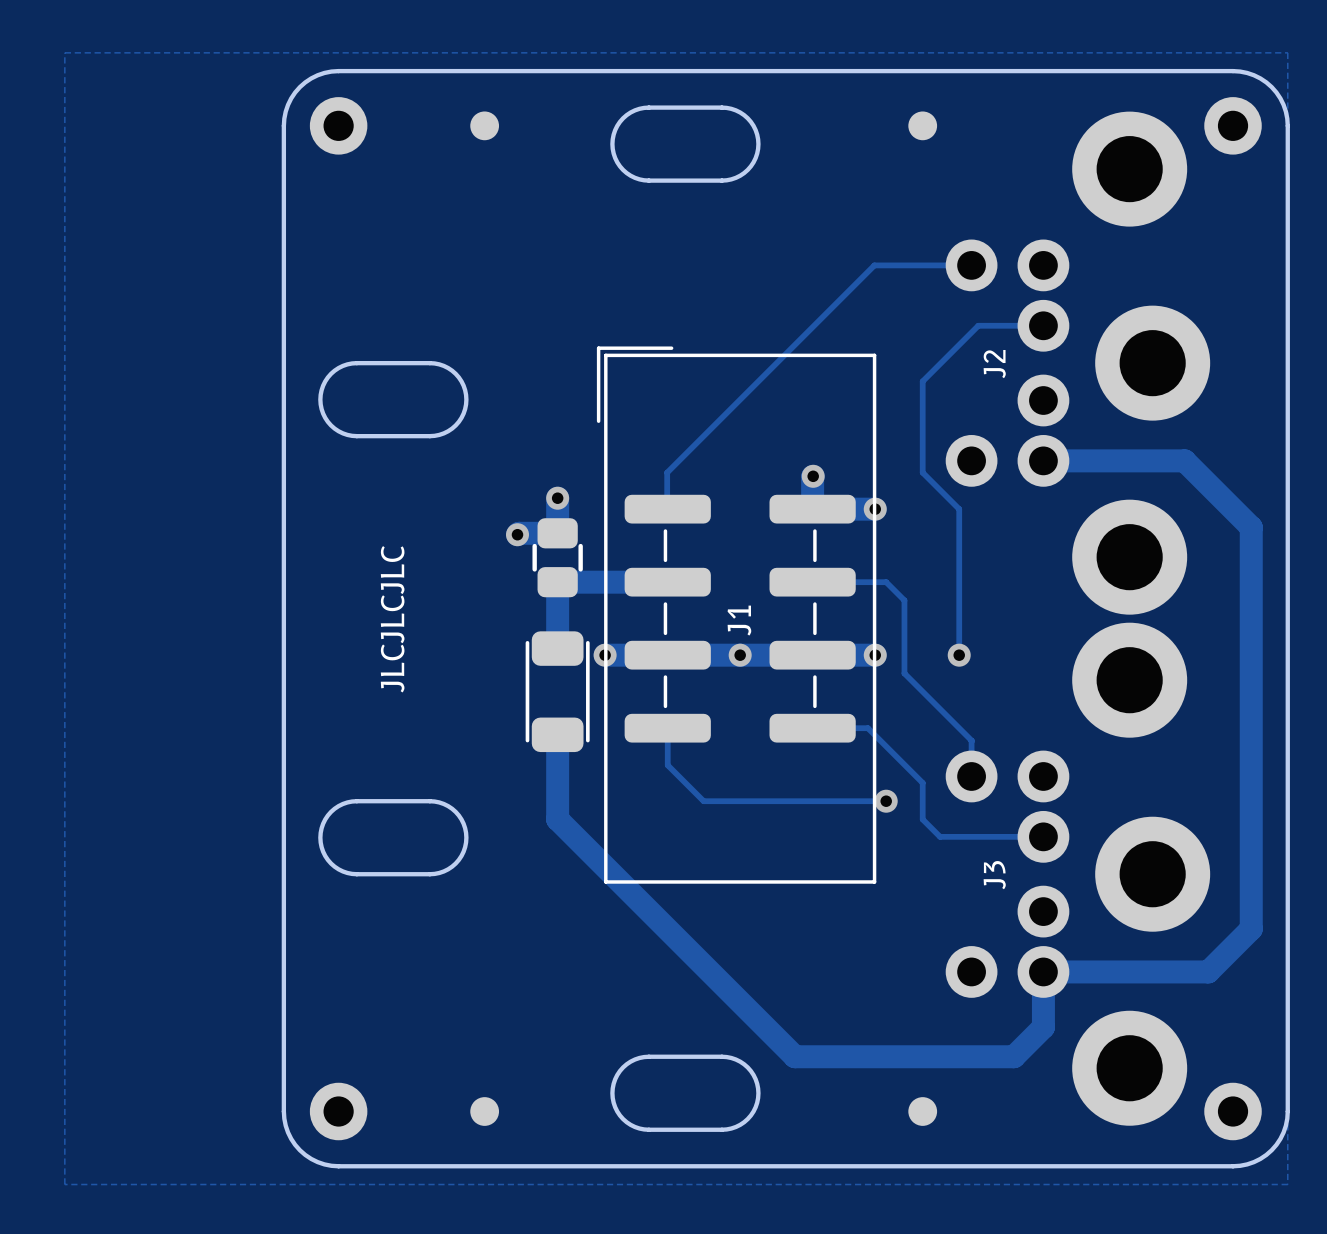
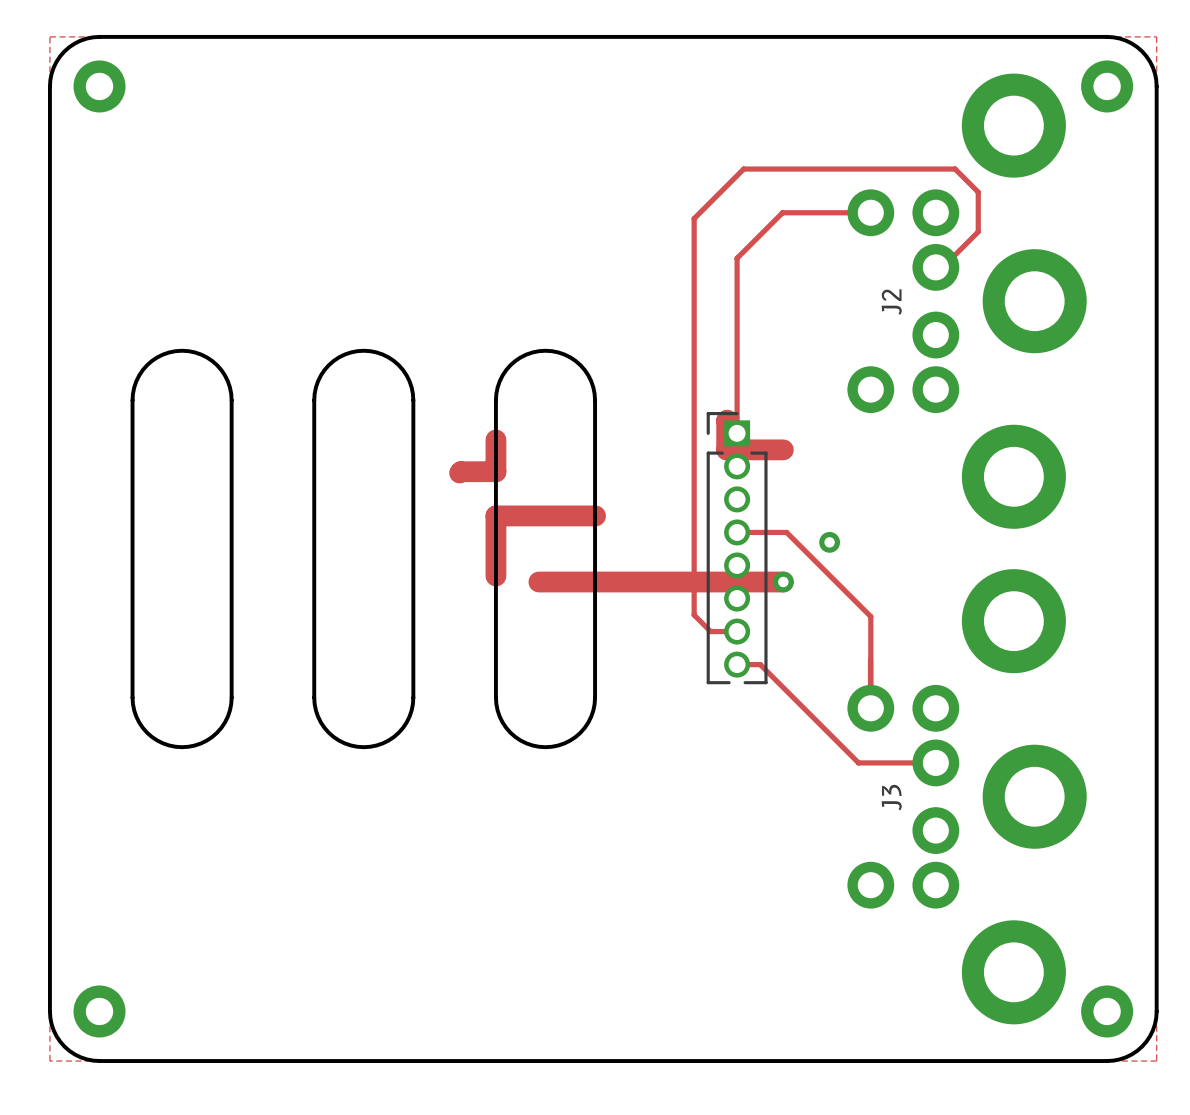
part position: (338, 125) -> (99, 86)
part: (484, 125) -> none
part: (922, 125) -> none
part position: (1233, 125) -> (1107, 86)
board edge: (1287, 125) (1283, 104) (1271, 87) (1253, 75) (1233, 71) (338, 71) (317, 75) (299, 87) (288, 104) (283, 125) (283, 1111) (288, 1132) (299, 1150) (317, 1162) (338, 1166) (1233, 1166) (1253, 1162) (1271, 1150) (1283, 1132) (1287, 1111) -> (1156, 102) (1154, 73) (1146, 56) (1131, 43) (1119, 38) (1107, 36) (99, 36) (80, 40) (64, 51) (53, 67) (49, 86) (49, 1011) (53, 1030) (60, 1041) (69, 1050) (86, 1059) (99, 1061) (1107, 1061) (1126, 1057) (1137, 1050) (1146, 1041) (1154, 1024) (1156, 994)
board edge: (648, 180) (634, 177) (626, 173) (619, 166) (613, 153) (612, 144) (615, 130) (623, 118) (630, 112) (648, 107) (726, 107) (744, 115) (753, 125) (758, 139) (757, 153) (750, 166) (740, 175) (721, 180) (648, 180) -> none
track: none -> (870, 212) (782, 212) (737, 258) (737, 433)
track: (971, 265) (874, 265) (667, 472) (667, 509) -> none
track: none -> (935, 267) (942, 267) (978, 231) (978, 192) (955, 169) (743, 169) (694, 218) (694, 615) (710, 631) (737, 631)
track: (1043, 325) (978, 325) (922, 381) (922, 472) (959, 509) (959, 655) -> none
J2 position: (1077, 363) -> (967, 301)
board edge: (356, 436) (342, 433) (334, 428) (327, 421) (321, 409) (320, 394) (323, 385) (331, 373) (338, 368) (356, 363) (434, 363) (452, 370) (461, 381) (466, 394) (465, 409) (458, 421) (448, 431) (429, 436) (356, 436) -> none
board edge: none -> (132, 400) (132, 704) (139, 722) (151, 736) (169, 745) (188, 746) (201, 743) (217, 732) (225, 722) (231, 704) (231, 393) (225, 375) (212, 360) (194, 352) (175, 351) (163, 354) (147, 365) (136, 381) (132, 400)
board edge: none -> (314, 400) (314, 704) (320, 722) (333, 736) (350, 745) (370, 746) (382, 743) (398, 732) (406, 722) (412, 704) (412, 393) (406, 375) (393, 360) (376, 352) (357, 351) (344, 354) (328, 365) (318, 381) (314, 400)
board edge: none -> (495, 400) (496, 704) (502, 722) (515, 736) (532, 745) (551, 746) (564, 743) (580, 732) (588, 722) (594, 704) (594, 393) (588, 375) (575, 360) (558, 352) (539, 351) (526, 354) (510, 365) (499, 381) (495, 400)
track: (1043, 460) (1184, 460) (1251, 527) (1251, 928) (1208, 971) (1043, 971) (1043, 1027) (1013, 1056) (794, 1056) (557, 819) (557, 734) -> none
via: (813, 476) -> none
via: (557, 498) -> none
via: (875, 509) -> none
via: (517, 534) -> none
part: (557, 557) -> none
track: (812, 582) (886, 582) (904, 600) (904, 673) (971, 740) -> none
track: none -> (737, 532) (786, 532) (870, 616) (870, 708)
J1: (736, 615) -> none
part: none -> (737, 548)
text: JLCJLCJLC (392, 619) -> none
via: (605, 655) -> none
via: (740, 655) -> none
via position: (959, 655) -> (829, 542)
part: (557, 691) -> none
track: (667, 728) (667, 765) (703, 801) (886, 801) -> none
track: (812, 728) (867, 728) (922, 782) (922, 819) -> (737, 664) (760, 664) (826, 730)
board edge: (356, 801) (429, 801) (448, 806) (458, 815) (465, 828) (466, 842) (461, 855) (448, 869) (434, 873) (356, 874) (338, 869) (331, 863) (323, 851) (320, 842) (321, 828) (327, 815) (334, 808) (342, 803) (356, 801) -> none
via: (886, 801) -> none
track: (940, 836) (1043, 836) -> (842, 746) (858, 762) (935, 762)
J3 position: (1077, 874) -> (967, 796)
board edge: (721, 1056) (644, 1057) (630, 1061) (623, 1067) (613, 1083) (612, 1098) (615, 1107) (626, 1122) (639, 1128) (648, 1129) -> none
board edge: (721, 1056) (740, 1061) (747, 1067) (755, 1079) (758, 1088) (757, 1102) (747, 1119) (740, 1124) (726, 1129) (648, 1129) -> none
part position: (338, 1111) -> (99, 1011)
part: (484, 1111) -> none
part: (922, 1111) -> none
part position: (1233, 1111) -> (1107, 1011)

